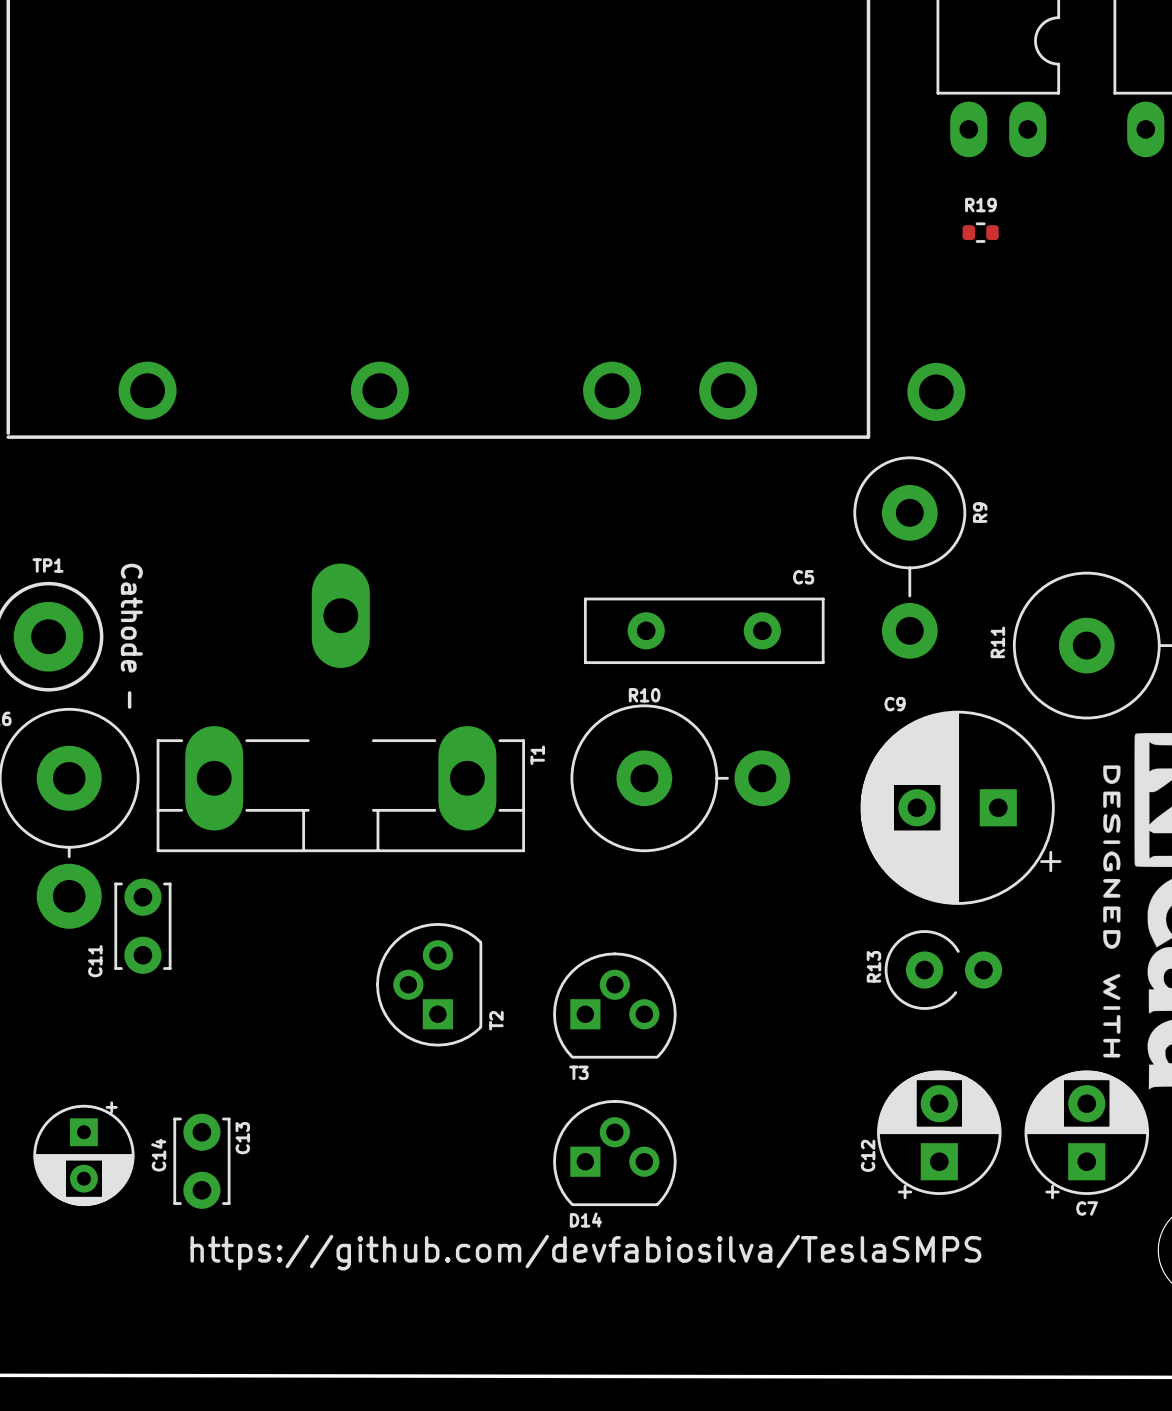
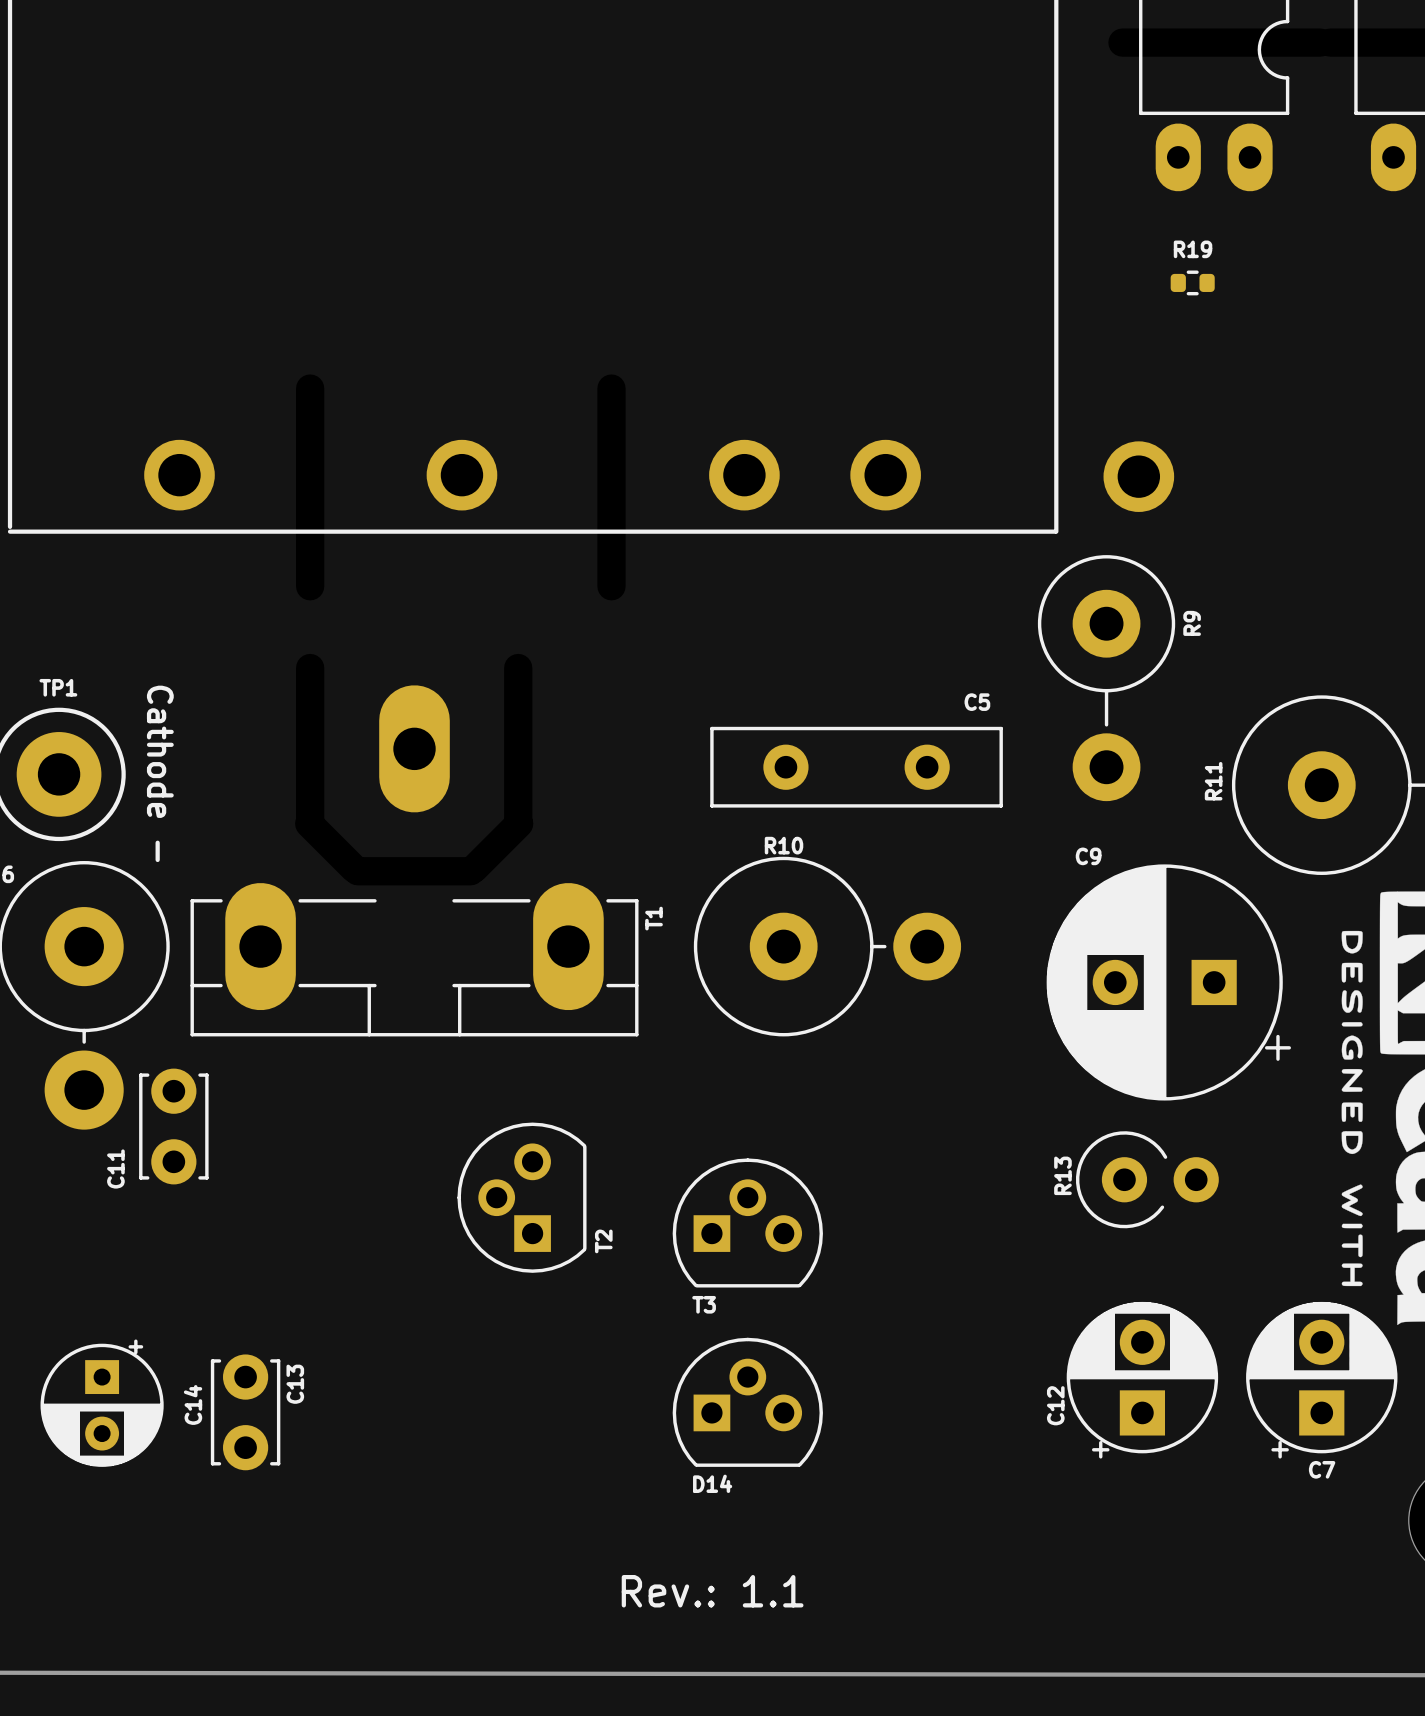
text: https://github.com/devfabiosilva/TeslaSMPS (585, 1252) -> none
text: none -> Rev.: 1.1 (712, 1591)

